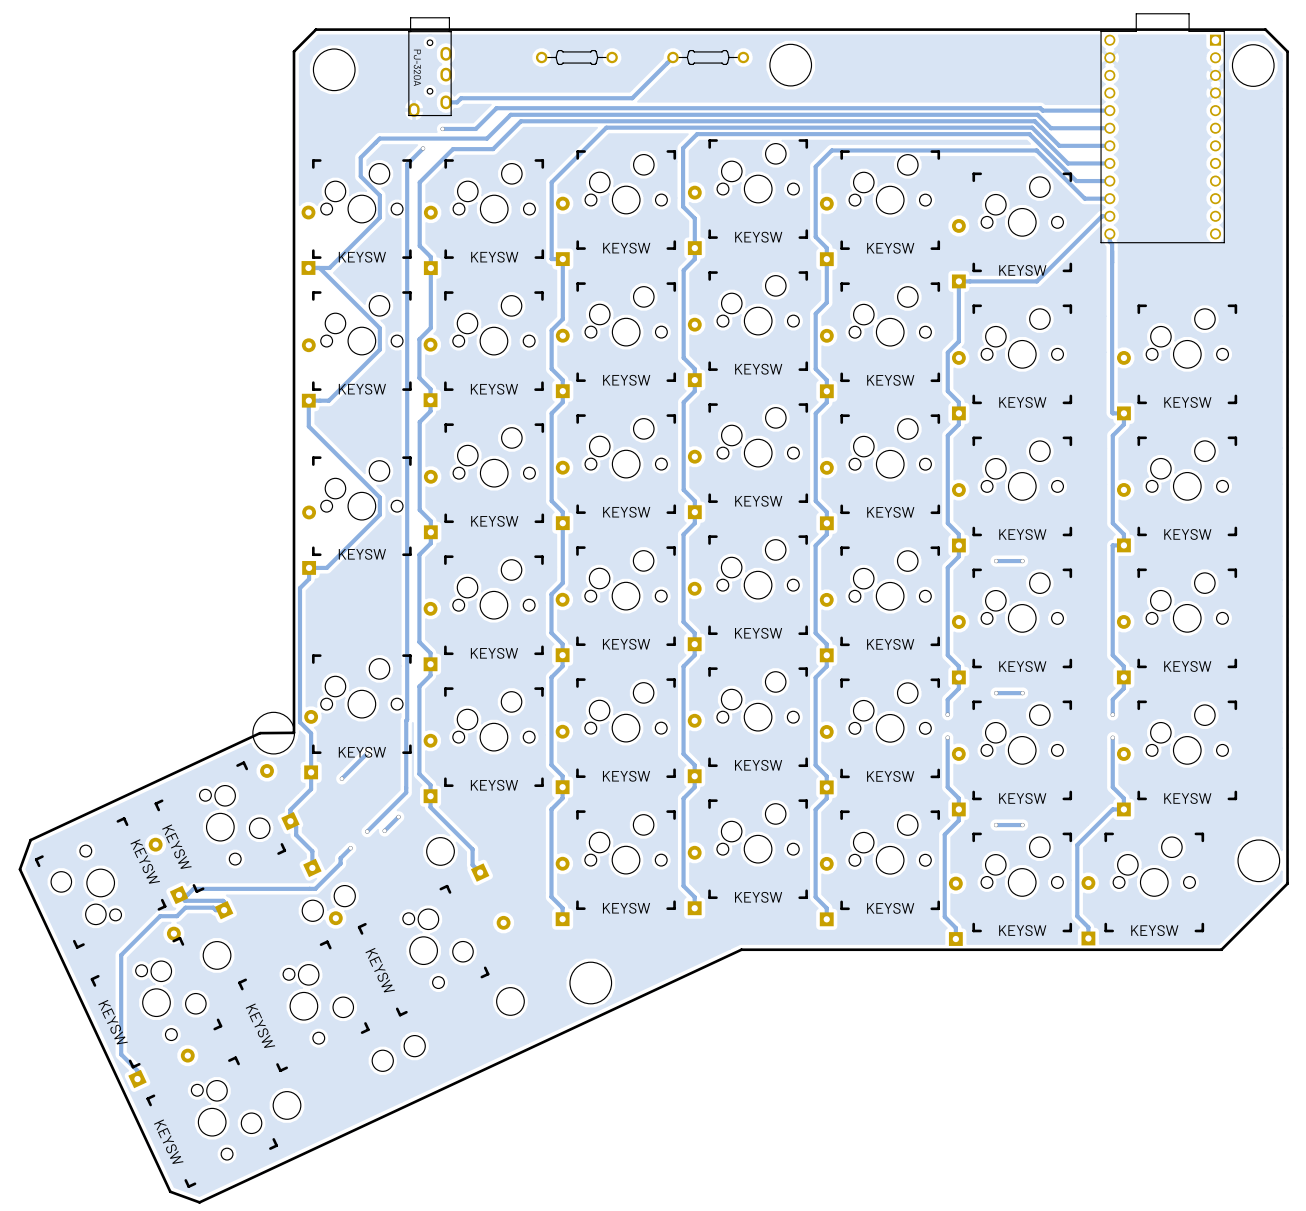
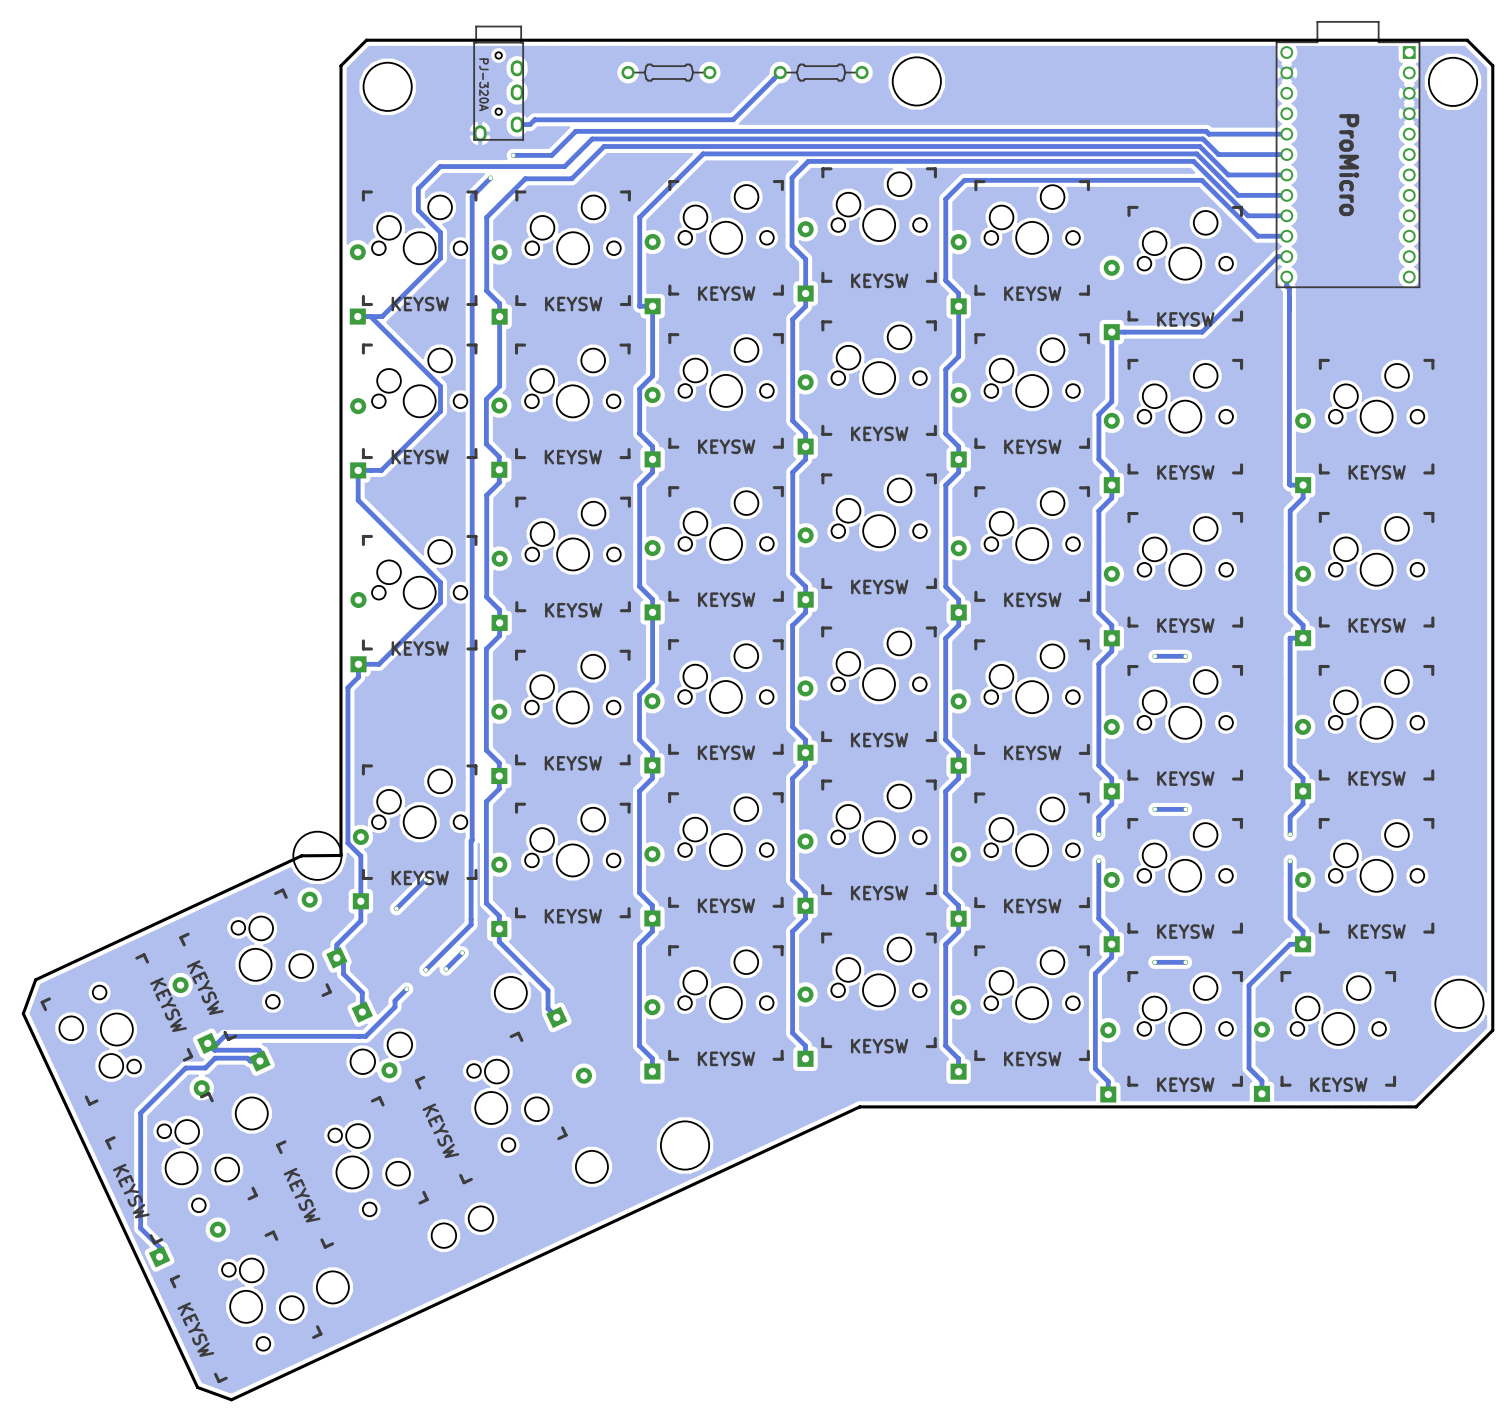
part value: none -> ProMicro (1349, 165)

